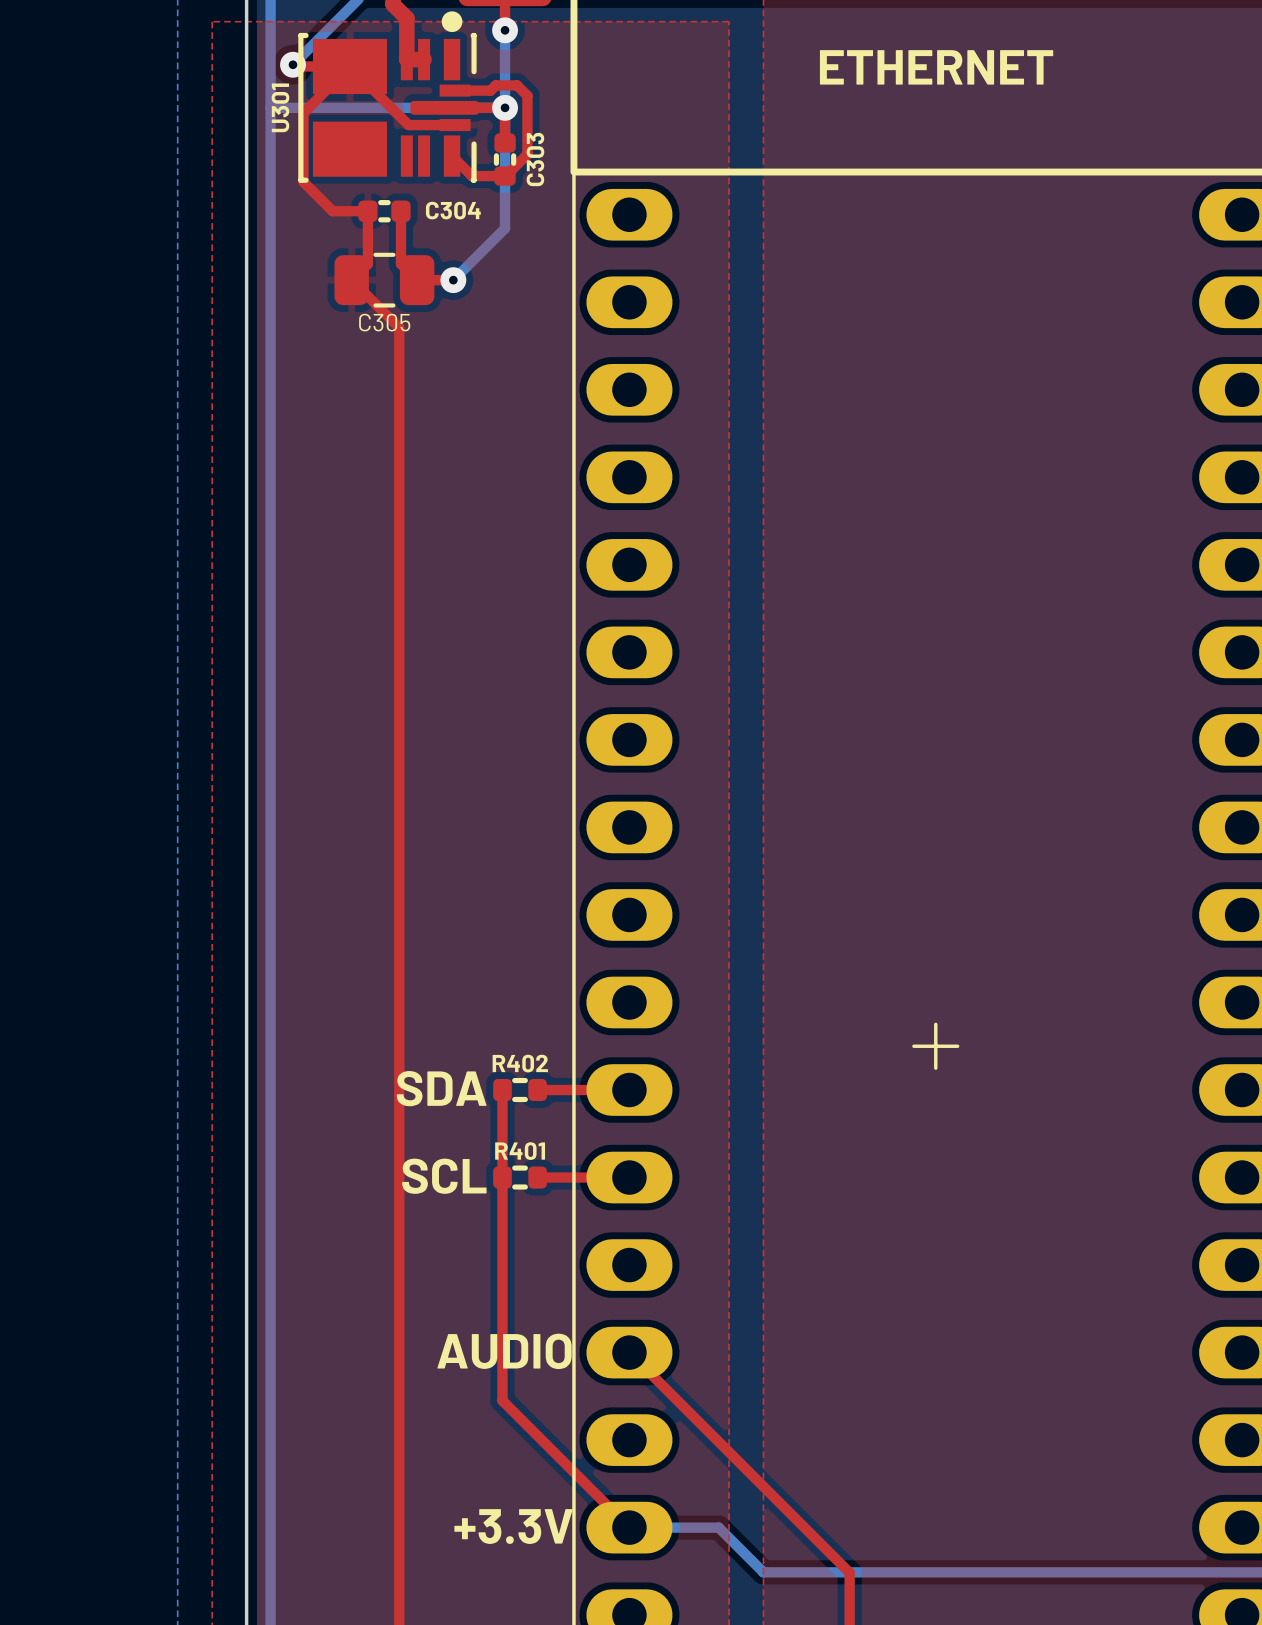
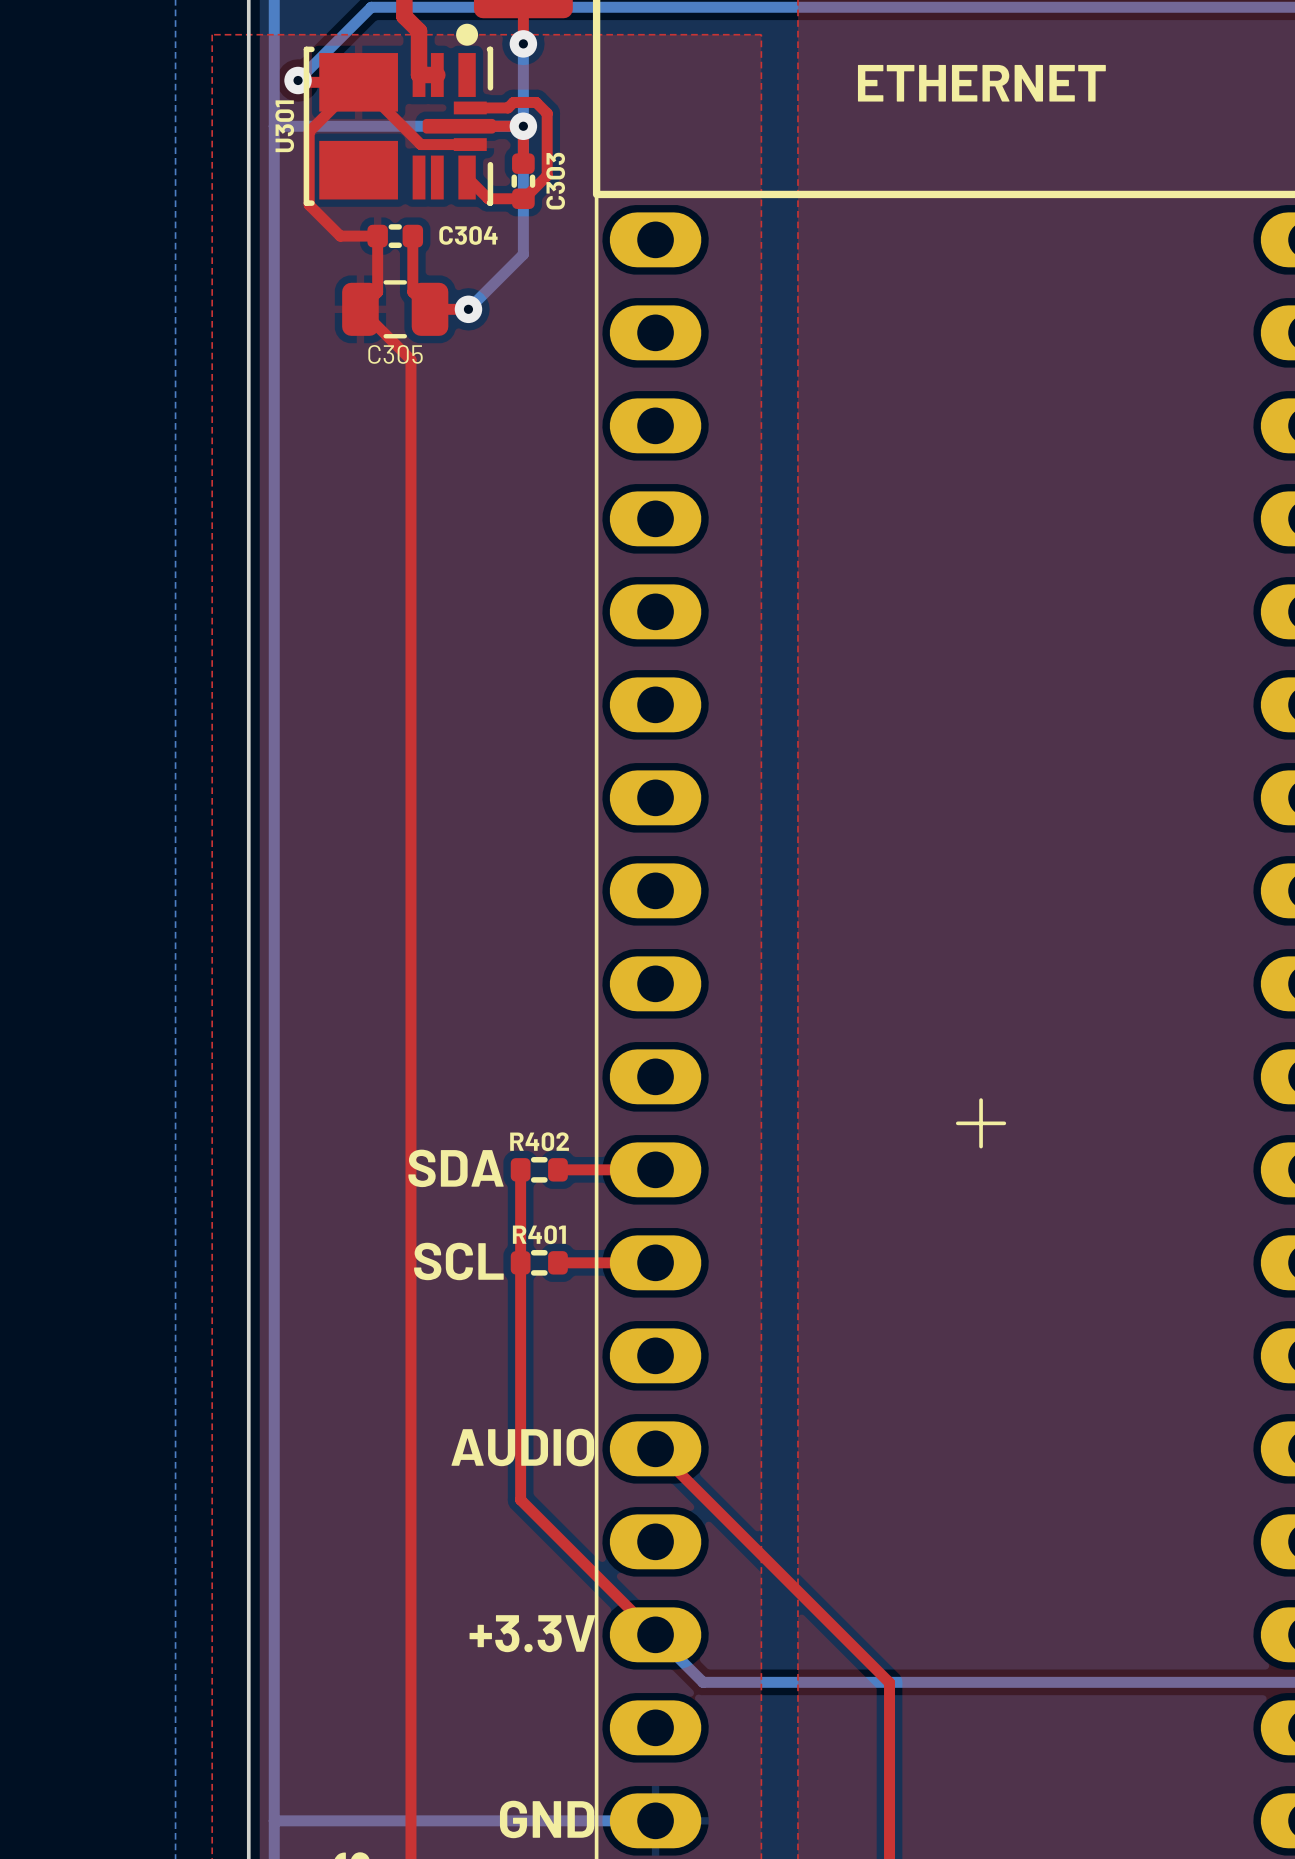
bottom track: (629, 1527) (718, 1527) (763, 1572) -> (655, 1634) (703, 1682) (797, 1682)

